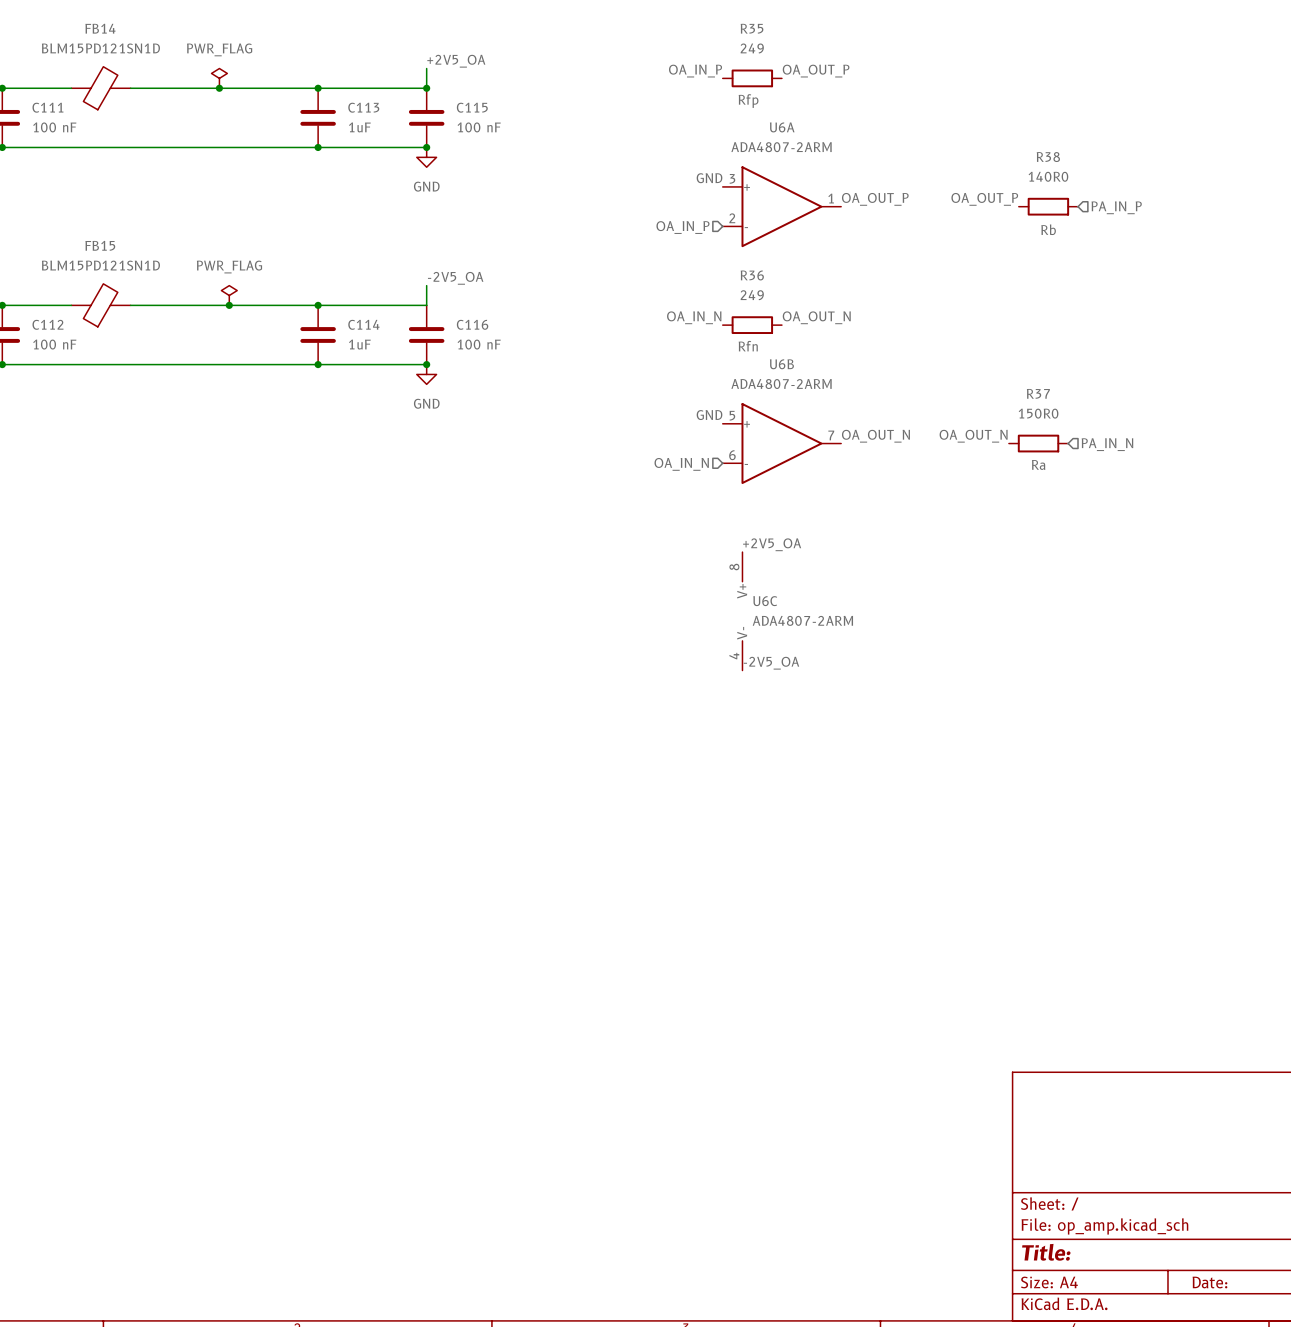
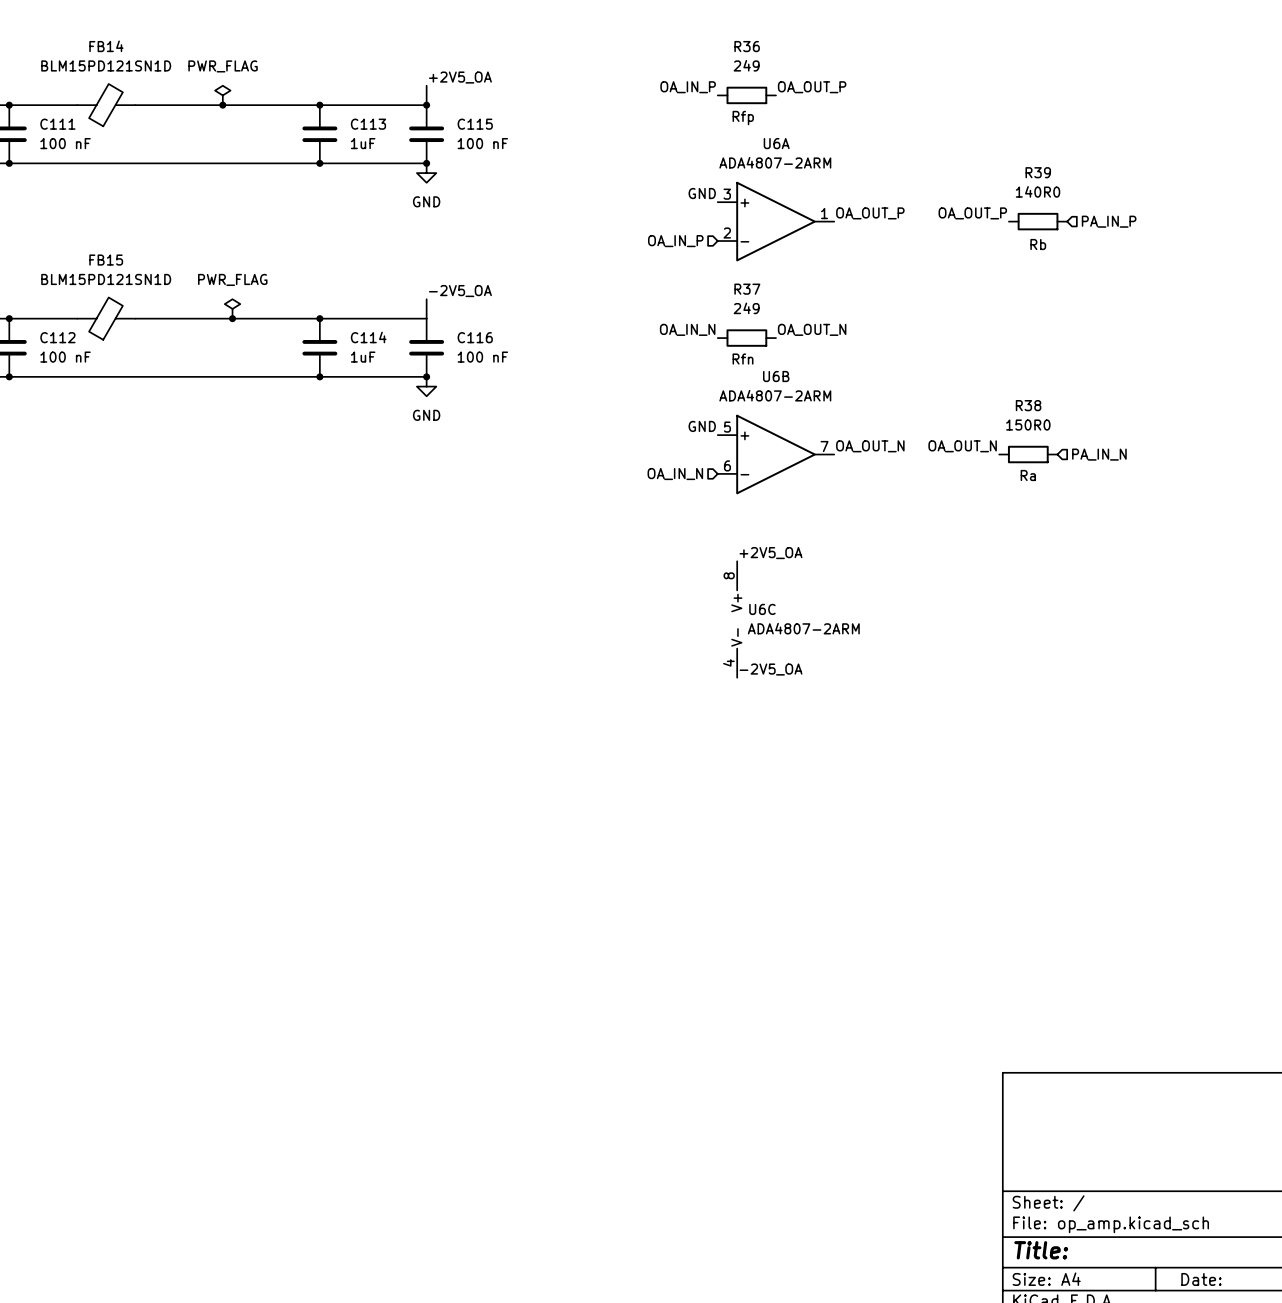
R35 name: R35 (752, 28) -> R36 (747, 46)
R38 name: R38 (1048, 157) -> R39 (1038, 172)
R36 name: R36 (752, 275) -> R37 (747, 289)
R37 name: R37 (1038, 393) -> R38 (1028, 405)

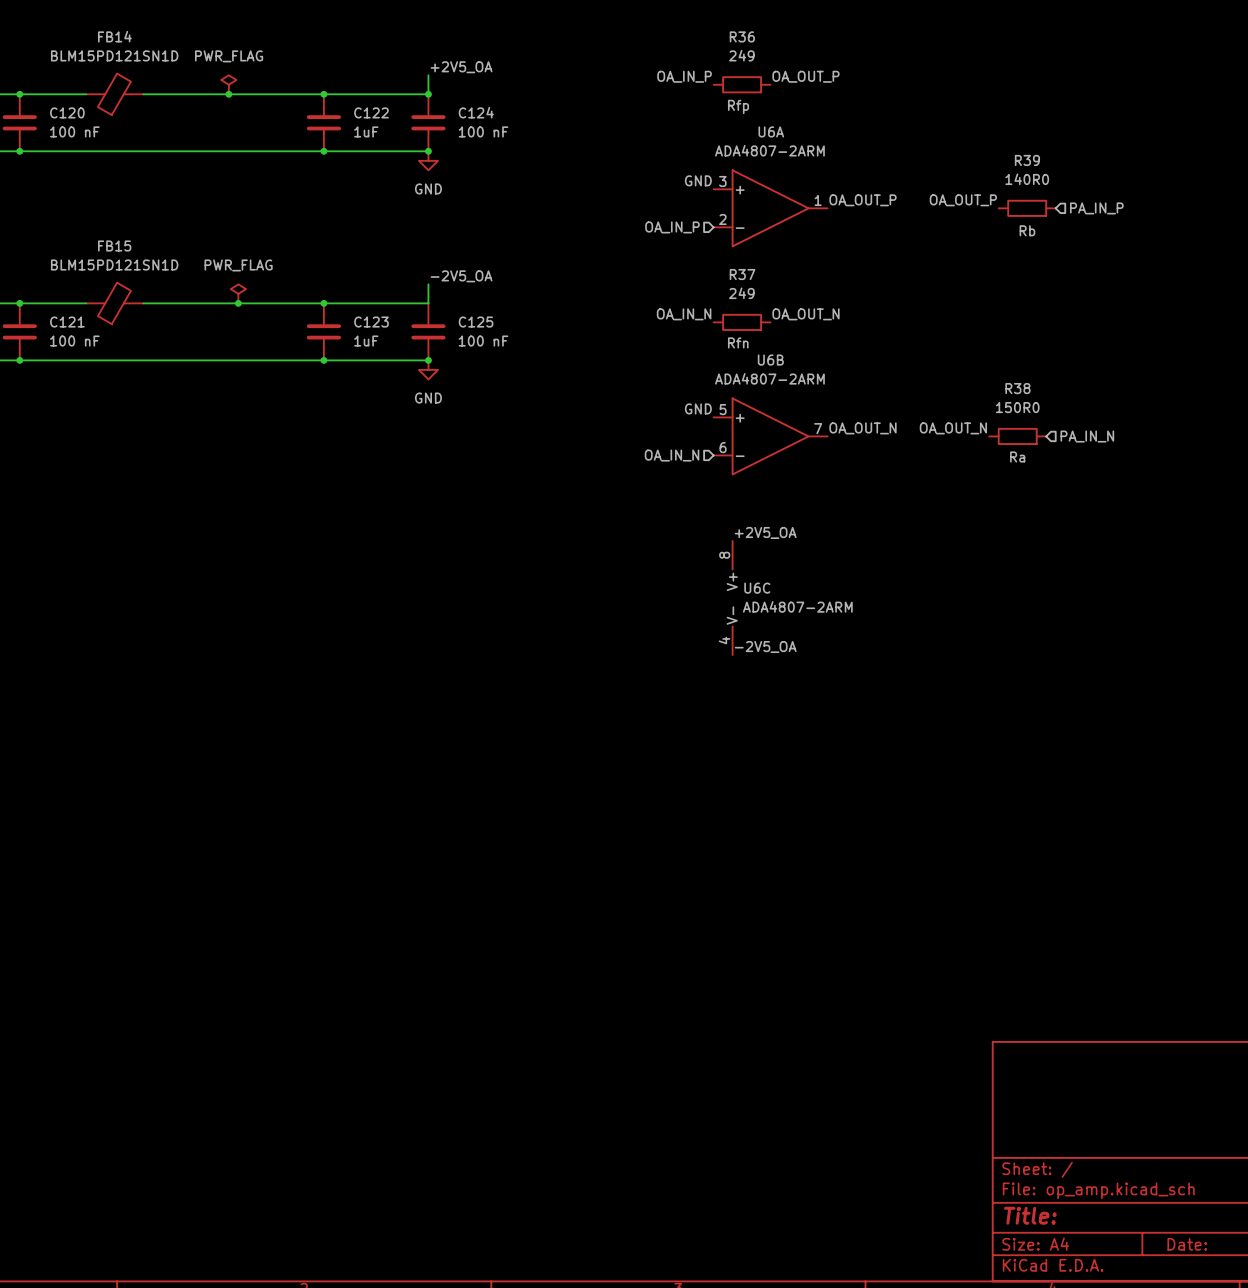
C111 name: C111 (57, 124) -> C120 (67, 112)
C113 name: C113 (368, 124) -> C122 (371, 112)
C115 name: C115 (475, 124) -> C124 (476, 112)
C112 name: C112 (57, 337) -> C121 (67, 322)
C114 name: C114 (368, 337) -> C123 (371, 322)
C116 name: C116 (475, 337) -> C125 (476, 322)

